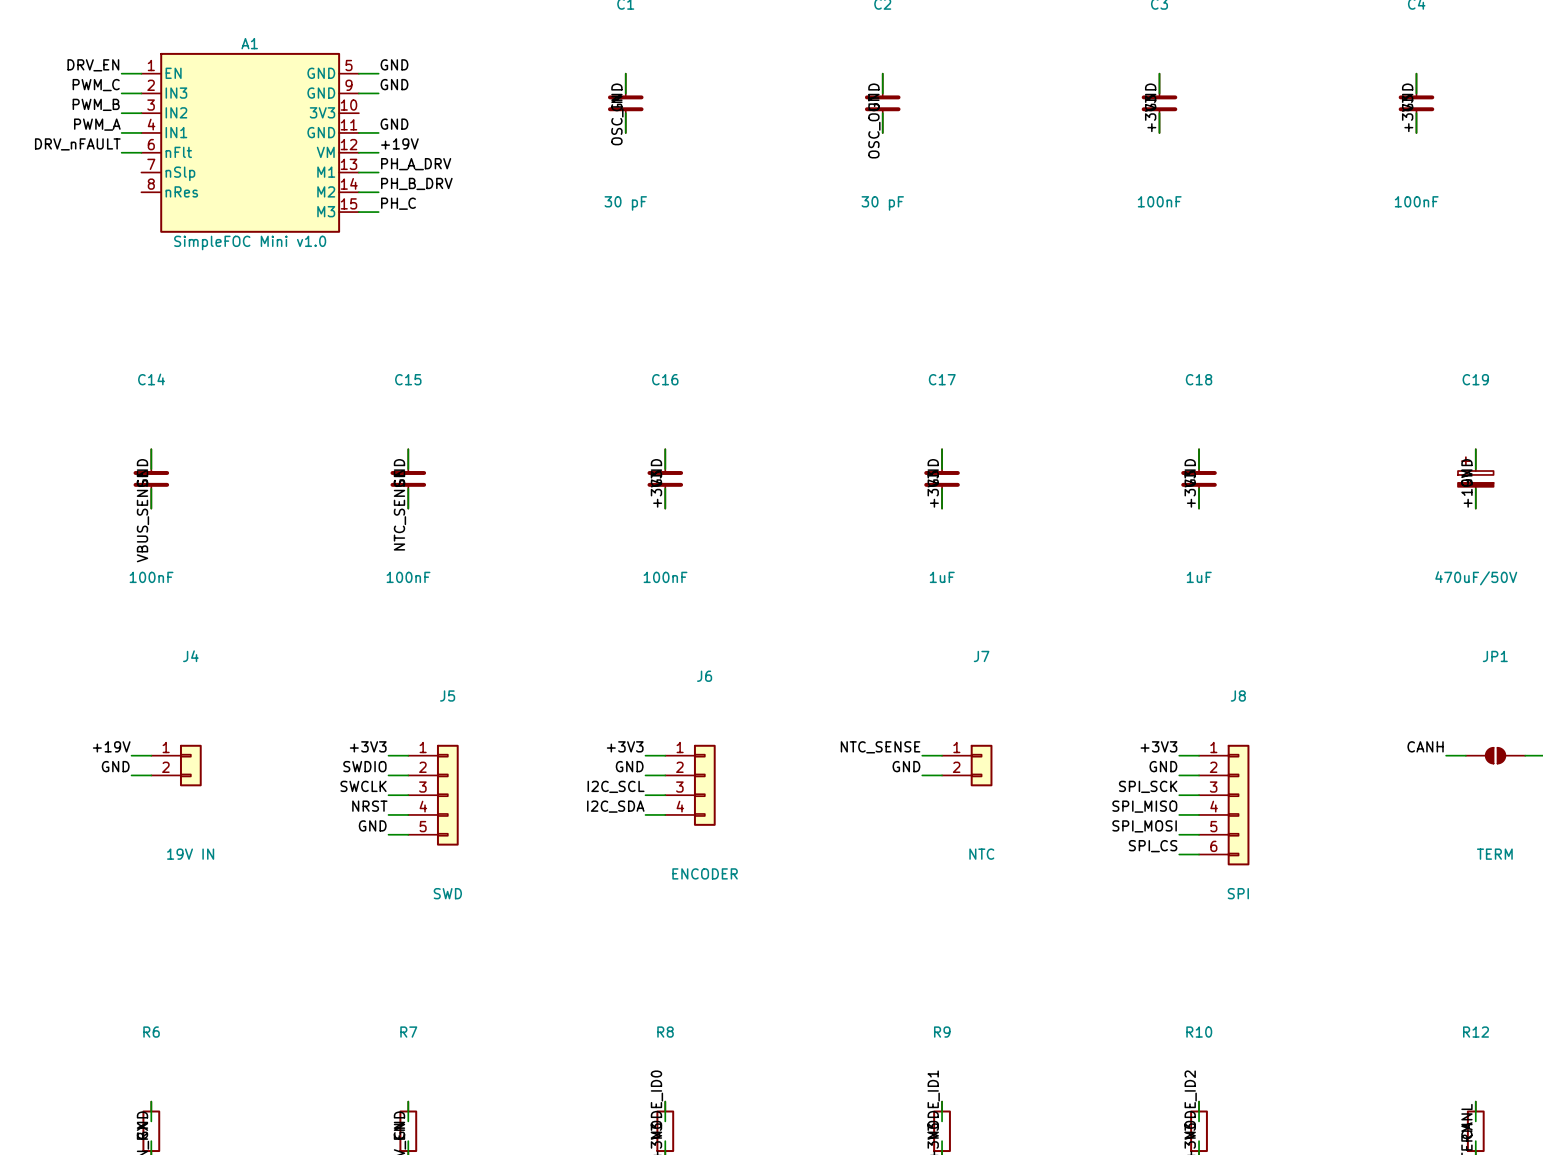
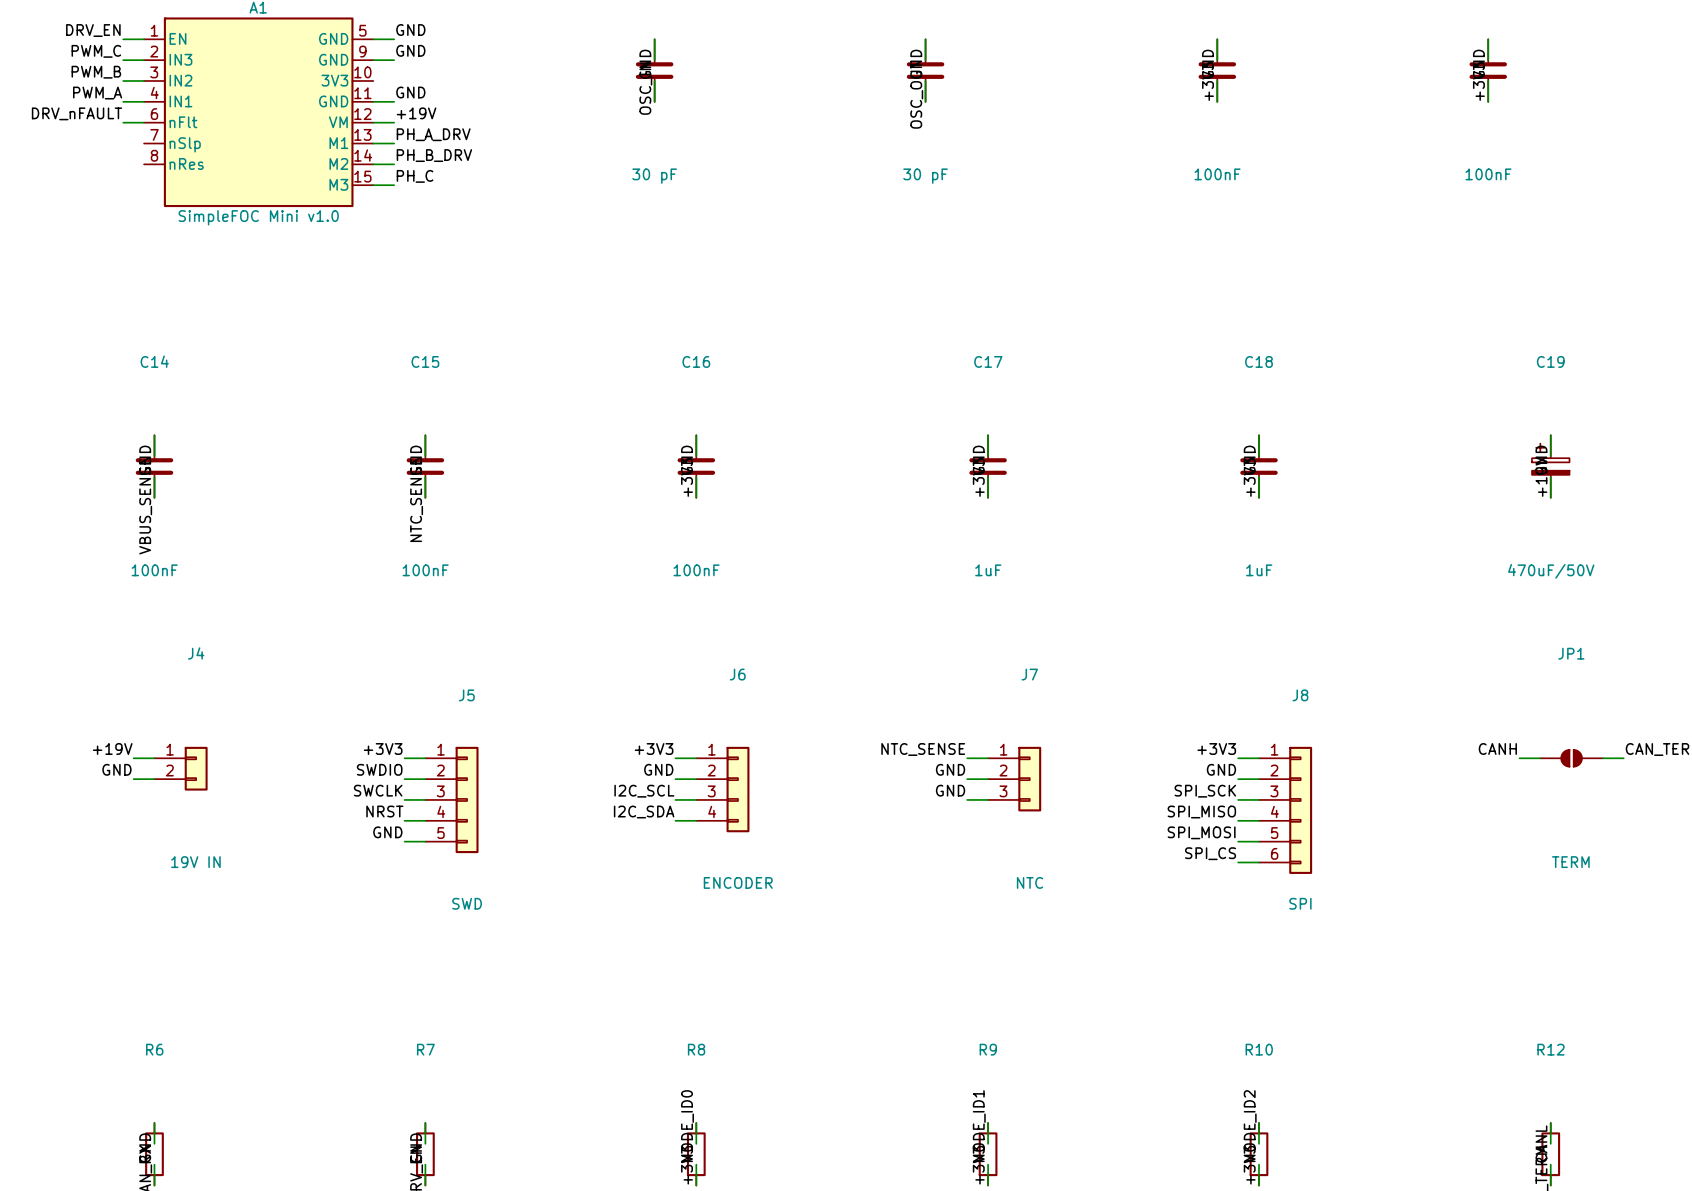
J7 symbol: [942, 744, 993, 787] -> [988, 746, 1042, 812]
label: none -> GND (950, 790)
wire: none -> (967, 799) (988, 799)

